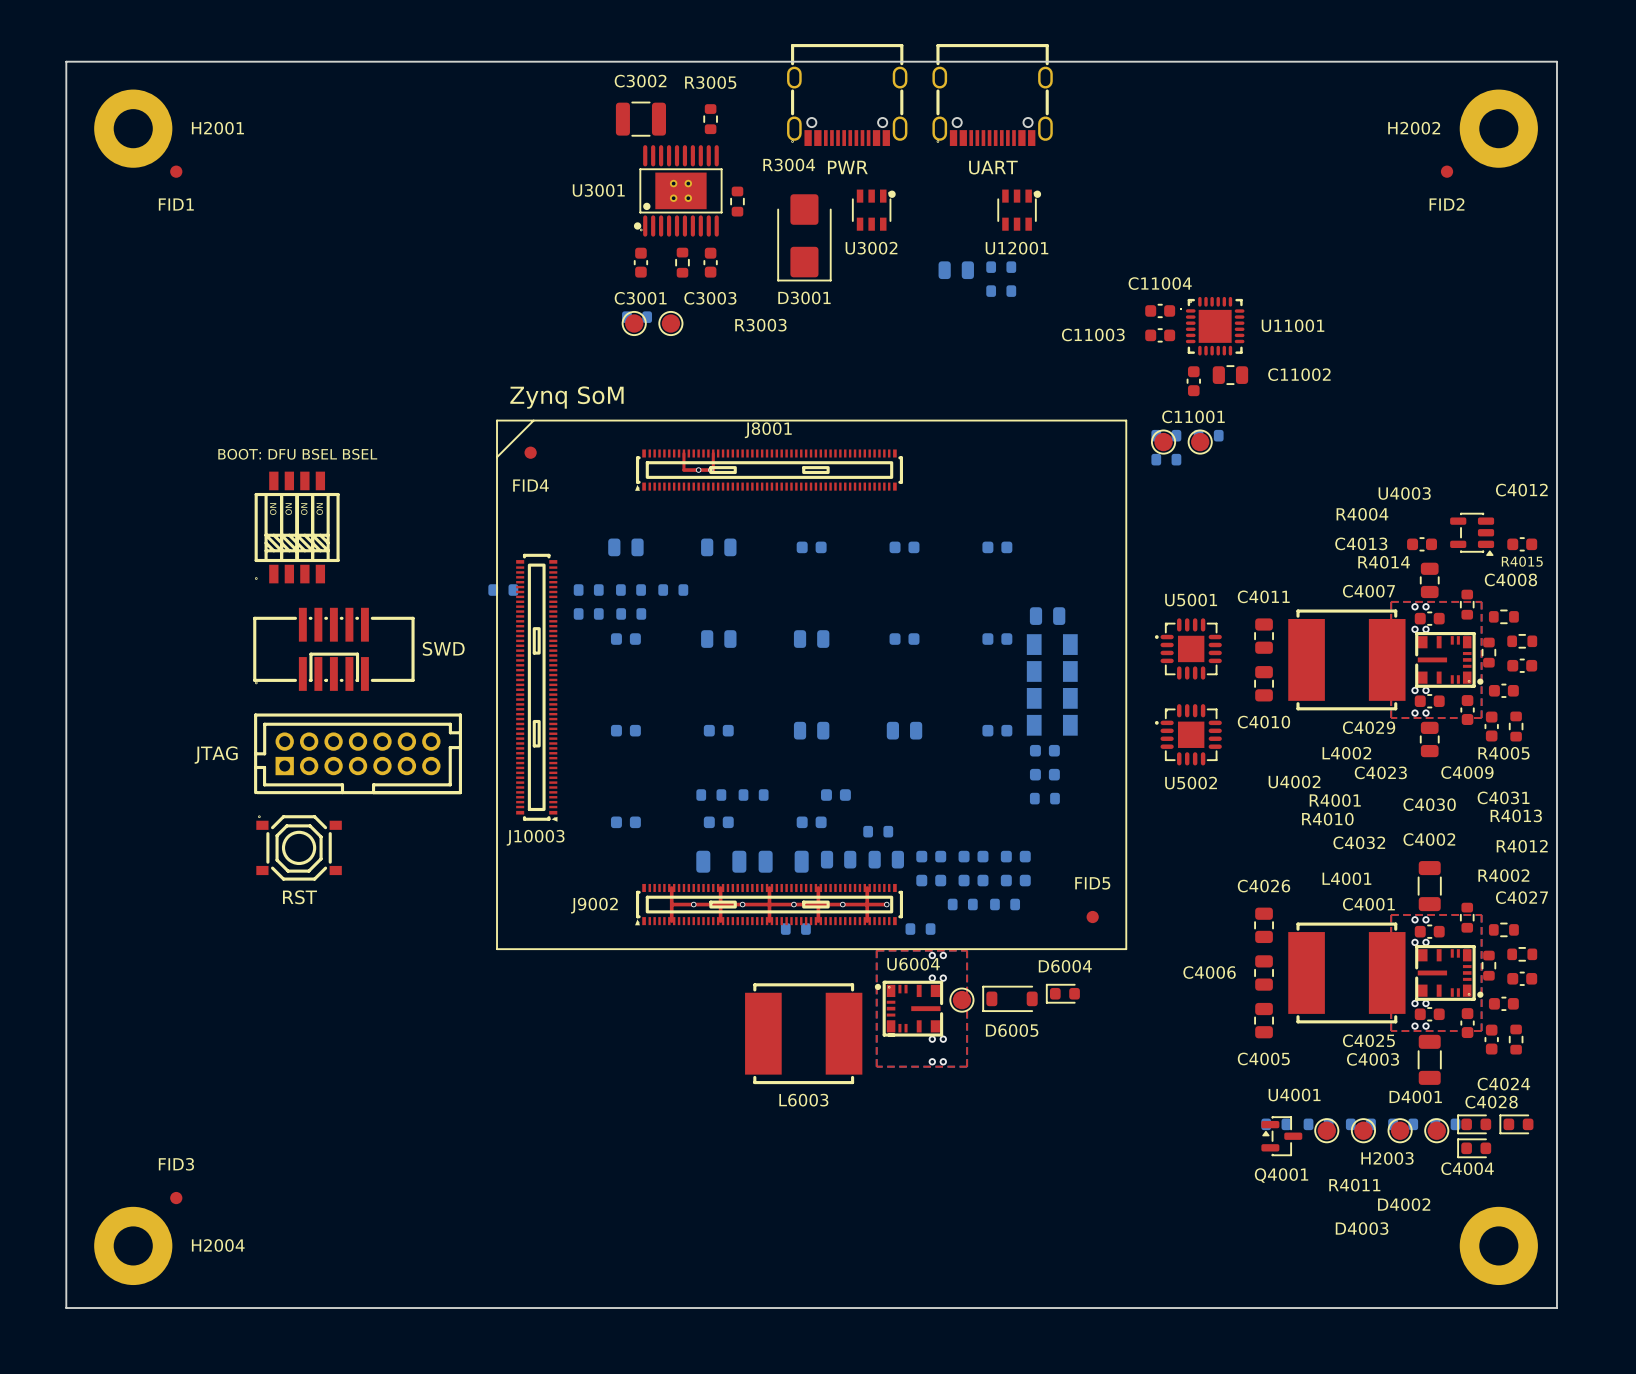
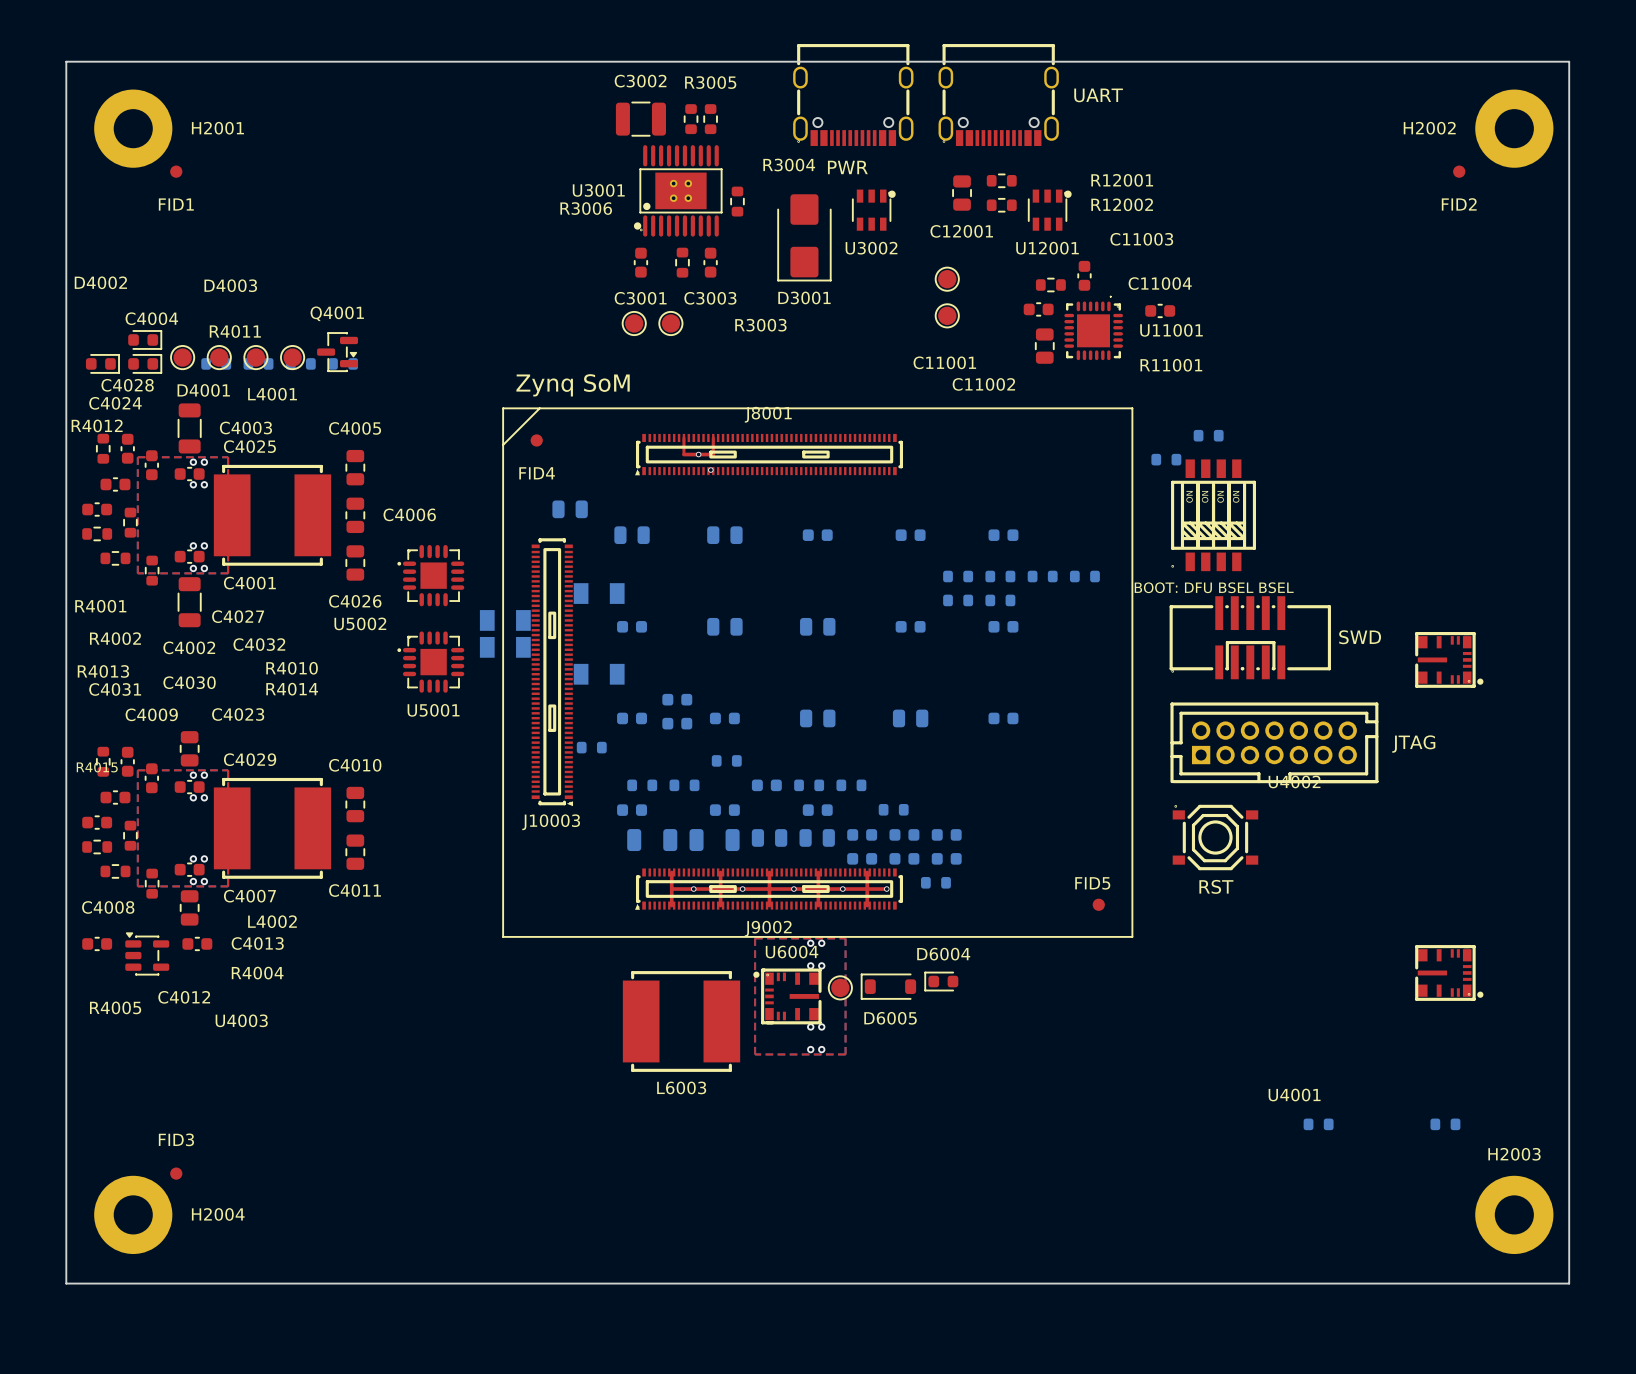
part footprint: [787, 44, 908, 146] -> [793, 44, 914, 146]
part footprint: [932, 44, 1053, 146] -> [938, 44, 1059, 146]
board edge: (1556, 61) (1556, 1308) (66, 1308) (66, 1283) -> (1556, 61) (1569, 61) (1569, 1283) (66, 1283)
H2002 position: (1498, 128) -> (1514, 128)
text position: UART (993, 167) -> UART (1098, 95)
FID2 position: (1447, 171) -> (1459, 171)
U12001 position: (1019, 210) -> (1049, 210)
R12001 side: bottom (1001, 267) -> top (1001, 180)
C12001 side: bottom (956, 270) -> top (962, 193)
part: none -> (947, 279)
R12002 side: bottom (1001, 291) -> top (1001, 205)
part: none -> (947, 315)
R3006 side: bottom (637, 317) -> top (691, 119)
U11001 rotation: 0° (1212, 326) -> 90° clockwise (1093, 328)
U11001 position: (1212, 326) -> (1093, 328)
C11003 name position: C11003 (1093, 334) -> C11003 (1141, 239)
C11003 rotation: 0° (1160, 335) -> 90° clockwise (1084, 275)
C11003 position: (1160, 335) -> (1084, 275)
part: none -> (182, 357)
part: none -> (219, 357)
part: none -> (255, 357)
part: none -> (292, 357)
part: none -> (216, 363)
part: none -> (258, 363)
part: none -> (300, 363)
part: none -> (343, 363)
C11002 name position: C11002 (1299, 374) -> C11002 (983, 384)
C11002 rotation: 0° (1230, 375) -> 90° clockwise (1044, 346)
C11002 position: (1230, 375) -> (1044, 346)
C11001 rotation: 0° (1193, 381) -> 90° clockwise (1038, 309)
C11001 position: (1193, 381) -> (1038, 309)
text position: Zynq SoM (566, 397) -> Zynq SoM (573, 385)
C11001 name position: C11001 (1193, 416) -> C11001 (944, 362)
line: (497, 420) (1126, 420) (1126, 949) (497, 949) (497, 420) -> (503, 408) (1132, 408) (1132, 936) (503, 936) (503, 408)
line: (533, 420) (497, 457) -> (539, 408) (503, 445)
R11001 side: bottom (1166, 435) -> top (1050, 285)
top track: none -> (683, 437) (683, 453)
top track: none -> (713, 437) (713, 453)
part: (1163, 442) -> none
part: (1200, 442) -> none
FID4 position: (530, 452) -> (536, 440)
text: BOOT: DFU BSEL BSEL (297, 454) -> none
top track: (683, 454) (683, 470) (713, 470) (713, 454) -> (683, 454) (713, 454)
top zone outline: none -> (137, 457) (228, 457) (228, 573) (137, 573) (137, 457)
via: none -> (193, 462)
via: none -> (204, 462)
via position: (698, 470) -> (698, 454)
J8001 position: (769, 470) -> (769, 454)
via: none -> (193, 484)
via: none -> (204, 484)
C4012 name position: C4012 (1521, 490) -> C4012 (184, 997)
U4003 name position: U4003 (1404, 493) -> U4003 (241, 1020)
part: none -> (570, 509)
R4004 name position: R4004 (1362, 514) -> R4004 (257, 973)
part: none -> (1213, 515)
part: (297, 527) -> none
U4003 rotation: 0° (1472, 534) -> 180° (147, 953)
U4003 position: (1472, 534) -> (147, 953)
C4013 name position: C4013 (1361, 543) -> C4013 (257, 943)
C4013 position: (1422, 544) -> (197, 943)
C4012 position: (1522, 544) -> (97, 943)
via: none -> (193, 545)
via: none -> (204, 545)
part position: (625, 547) -> (632, 535)
part position: (718, 547) -> (724, 535)
part position: (811, 547) -> (817, 535)
part position: (904, 547) -> (910, 535)
part position: (997, 547) -> (1003, 535)
R4014 name position: R4014 (1384, 562) -> R4014 (292, 689)
via: none -> (193, 568)
via: none -> (204, 568)
part: none -> (958, 576)
part: none -> (1000, 576)
part: none -> (1042, 576)
part: none -> (1084, 576)
C4008 name position: C4008 (1510, 579) -> C4008 (108, 907)
C4008 position: (1429, 580) -> (189, 907)
part footprint: [573, 584, 604, 596] -> [573, 583, 625, 604]
text: none -> BOOT: DFU BSEL BSEL (1214, 587)
part: (503, 590) -> none
part: (631, 590) -> none
part: (673, 590) -> none
C4007 name position: C4007 (1368, 591) -> C4007 (249, 896)
C4011 name position: C4011 (1263, 596) -> C4011 (355, 890)
part: none -> (958, 600)
part: none -> (1000, 600)
U5001 name position: U5001 (1191, 600) -> U5001 (433, 710)
top zone outline: (1391, 601) (1391, 717) (1481, 717) (1481, 601) (1391, 601) -> none
R4004 position: (1467, 604) -> (152, 883)
via: (1415, 606) -> none
via: (1426, 606) -> none
part: (588, 613) -> none
part: (631, 613) -> none
part: (1047, 616) -> none
R4005 position: (1503, 616) -> (115, 871)
C4007 position: (1429, 618) -> (189, 869)
part: none -> (505, 620)
via: (1415, 629) -> none
via: (1426, 629) -> none
C4011 position: (1264, 636) -> (355, 852)
part: none -> (1250, 637)
text: none -> SWD (1360, 637)
part position: (625, 639) -> (632, 626)
part position: (718, 639) -> (724, 626)
part position: (811, 639) -> (817, 626)
part position: (904, 639) -> (910, 626)
part position: (997, 639) -> (1003, 626)
R4015 position: (1522, 641) -> (97, 847)
part: (1052, 644) -> none
part: none -> (505, 647)
text: SWD (443, 648) -> none
U5001 position: (1188, 648) -> (430, 662)
part: (333, 649) -> none
R4014 position: (1488, 652) -> (130, 835)
L4002 rotation: 0° (1346, 659) -> 180° (272, 828)
L4002 position: (1346, 659) -> (272, 828)
C4023 position: (1522, 665) -> (97, 822)
part: (1052, 671) -> none
part: none -> (599, 674)
C4010 position: (1264, 683) -> (355, 804)
J10003 position: (536, 687) -> (552, 672)
via: (1415, 690) -> none
via: (1426, 690) -> none
C4031 position: (1503, 690) -> (115, 797)
part: (1052, 698) -> none
part: none -> (677, 699)
C4029 position: (1429, 701) -> (189, 787)
C4009 position: (1467, 710) -> (151, 778)
via: (1415, 713) -> none
via: (1426, 713) -> none
C4010 name position: C4010 (1263, 722) -> C4010 (355, 765)
part: none -> (677, 723)
part: (1052, 725) -> none
C4032 position: (1491, 726) -> (127, 761)
R4013 position: (1516, 726) -> (103, 761)
C4029 name position: C4029 (1369, 727) -> C4029 (250, 759)
part position: (625, 730) -> (632, 718)
part position: (718, 730) -> (724, 718)
part position: (811, 730) -> (817, 718)
part position: (904, 730) -> (910, 718)
part position: (997, 730) -> (1003, 718)
U5002 position: (1188, 734) -> (430, 575)
C4030 position: (1429, 739) -> (189, 748)
part: none -> (1274, 742)
text: none -> JTAG (1413, 744)
part: none -> (591, 747)
part: (1044, 750) -> none
part: (358, 753) -> none
text: JTAG (216, 755) -> none
part: none -> (726, 760)
top zone outline: none -> (137, 770) (137, 886) (228, 886) (228, 770) (137, 770)
C4023 name position: C4023 (1380, 772) -> C4023 (238, 714)
C4009 name position: C4009 (1467, 772) -> C4009 (151, 714)
part: (1044, 774) -> none
via: none -> (193, 775)
via: none -> (204, 775)
U5002 name position: U5002 (1191, 783) -> U5002 (360, 623)
part: none -> (642, 785)
part: none -> (684, 785)
part: none -> (766, 785)
part: none -> (809, 785)
part: none -> (851, 785)
part: (711, 795) -> none
part: (753, 795) -> none
part: (835, 795) -> none
via: none -> (193, 797)
via: none -> (204, 797)
C4031 name position: C4031 (1503, 797) -> C4031 (115, 689)
part: (1044, 798) -> none
R4001 name position: R4001 (1335, 800) -> R4001 (100, 606)
C4030 name position: C4030 (1429, 804) -> C4030 (189, 682)
part: none -> (893, 809)
part: none -> (817, 810)
R4013 name position: R4013 (1516, 815) -> R4013 (103, 671)
R4010 name position: R4010 (1327, 819) -> R4010 (292, 668)
part position: (625, 822) -> (632, 810)
part position: (718, 822) -> (724, 810)
part: (811, 822) -> none
part: (878, 831) -> none
part: none -> (862, 834)
part: none -> (904, 834)
part: none -> (946, 834)
part: none -> (769, 837)
part: none -> (1215, 837)
C4002 name position: C4002 (1429, 839) -> C4002 (189, 647)
part: none -> (652, 840)
C4032 name position: C4032 (1359, 842) -> C4032 (259, 644)
part: (299, 847) -> none
part: (931, 856) -> none
part: (973, 856) -> none
part: (1015, 856) -> none
via: none -> (193, 858)
via: none -> (204, 858)
part: none -> (862, 858)
part: none -> (904, 858)
part: none -> (946, 858)
part position: (838, 859) -> (817, 837)
part: (886, 859) -> none
part position: (721, 861) -> (714, 840)
part: (783, 861) -> none
part footprint: [916, 874, 947, 887] -> [920, 877, 951, 889]
R4002 name position: R4002 (1503, 875) -> R4002 (115, 638)
L4001 name position: L4001 (1346, 878) -> L4001 (272, 394)
part: (973, 880) -> none
part: (1015, 880) -> none
via: none -> (193, 881)
via: none -> (204, 881)
text: none -> RST (1216, 886)
C4026 name position: C4026 (1263, 886) -> C4026 (355, 601)
C4002 position: (1429, 886) -> (189, 602)
text: RST (300, 897) -> none
C4027 name position: C4027 (1521, 897) -> C4027 (238, 616)
top track: (671, 904) (886, 904) -> (671, 889) (886, 889)
via position: (693, 904) -> (693, 889)
via position: (742, 904) -> (742, 889)
J9002 position: (769, 904) -> (769, 889)
via position: (793, 904) -> (793, 889)
via position: (842, 904) -> (842, 889)
via position: (886, 904) -> (886, 889)
part: (962, 904) -> none
part: (1005, 904) -> none
C4001 name position: C4001 (1368, 904) -> C4001 (249, 583)
J9002 name position: J9002 (594, 905) -> J9002 (768, 928)
top track: (671, 905) (671, 921) -> (671, 872) (671, 887)
top track: (720, 905) (720, 921) -> (720, 872) (720, 887)
top track: (769, 905) (769, 921) -> (769, 872) (769, 887)
top track: (818, 905) (818, 921) -> (818, 872) (818, 887)
top track: (867, 905) (867, 921) -> (867, 872) (867, 887)
top zone outline: (1391, 914) (1391, 1031) (1481, 1031) (1481, 914) (1391, 914) -> none
FID5 position: (1092, 917) -> (1098, 904)
R4001 position: (1467, 917) -> (152, 570)
via: (1415, 919) -> none
via: (1426, 919) -> none
C4026 position: (1264, 925) -> (355, 562)
part: (795, 929) -> none
part: (920, 929) -> none
R4002 position: (1503, 929) -> (115, 558)
C4001 position: (1429, 931) -> (189, 556)
via: (1415, 942) -> none
via: (1426, 942) -> none
via: none -> (810, 943)
via: none -> (821, 943)
top zone outline: (876, 950) (967, 950) (967, 1066) (876, 1066) (876, 950) -> (755, 938) (845, 938) (845, 1054) (755, 1054) (755, 938)
R4012 position: (1522, 954) -> (97, 533)
via: (932, 955) -> none
via: (943, 955) -> none
via: none -> (810, 965)
via: none -> (821, 965)
R4010 position: (1488, 965) -> (130, 522)
C4006 name position: C4006 (1209, 972) -> C4006 (409, 514)
C4006 position: (1264, 972) -> (355, 515)
L4001 rotation: 0° (1346, 972) -> 180° (272, 515)
L4001 position: (1346, 972) -> (272, 515)
via: (932, 978) -> none
via: (943, 978) -> none
C4027 position: (1522, 978) -> (97, 509)
D6004 position: (1062, 993) -> (941, 981)
D6005 position: (1010, 998) -> (888, 986)
part position: (961, 1000) -> (840, 987)
via: (1415, 1003) -> none
via: (1426, 1003) -> none
C4024 position: (1503, 1003) -> (115, 484)
U6004 position: (909, 1008) -> (787, 996)
C4025 position: (1429, 1014) -> (189, 474)
C4005 position: (1264, 1020) -> (355, 467)
C4004 position: (1467, 1023) -> (151, 465)
via: none -> (810, 1026)
via: none -> (821, 1026)
via: (1415, 1026) -> none
via: (1426, 1026) -> none
L6003 position: (803, 1033) -> (681, 1021)
via: (932, 1039) -> none
via: (943, 1039) -> none
C4028 position: (1491, 1039) -> (127, 448)
R4011 position: (1516, 1039) -> (103, 448)
C4025 name position: C4025 (1368, 1040) -> C4025 (249, 446)
via: none -> (810, 1049)
via: none -> (821, 1049)
C4005 name position: C4005 (1263, 1058) -> C4005 (355, 428)
C4003 name position: C4003 (1373, 1059) -> C4003 (245, 428)
C4003 position: (1429, 1059) -> (189, 428)
via: (932, 1061) -> none
via: (943, 1061) -> none
C4024 name position: C4024 (1503, 1084) -> C4024 (115, 403)
C4028 name position: C4028 (1491, 1102) -> C4028 (127, 385)
part: (1276, 1124) -> none
part: (1360, 1124) -> none
part: (1403, 1124) -> none
D4001 rotation: 0° (1474, 1124) -> 180° (145, 363)
D4001 position: (1474, 1124) -> (145, 363)
D4002 rotation: 0° (1516, 1124) -> 180° (102, 363)
D4002 position: (1516, 1124) -> (102, 363)
part: (1326, 1130) -> none
part: (1363, 1130) -> none
part: (1400, 1130) -> none
part: (1436, 1130) -> none
Q4001 rotation: 0° (1281, 1136) -> 180° (337, 352)
Q4001 position: (1281, 1136) -> (337, 352)
D4003 rotation: 0° (1474, 1148) -> 180° (145, 339)
D4003 position: (1474, 1148) -> (145, 339)
H2003 name position: H2003 (1387, 1158) -> H2003 (1514, 1154)
C4004 name position: C4004 (1467, 1168) -> C4004 (151, 318)
R4011 name position: R4011 (1354, 1185) -> R4011 (235, 331)
FID3 position: (176, 1198) -> (176, 1173)
D4002 name position: D4002 (1404, 1204) -> D4002 (100, 282)
D4003 name position: D4003 (1362, 1228) -> D4003 (230, 285)
H2004 position: (133, 1245) -> (133, 1214)
H2003 position: (1498, 1245) -> (1514, 1214)

